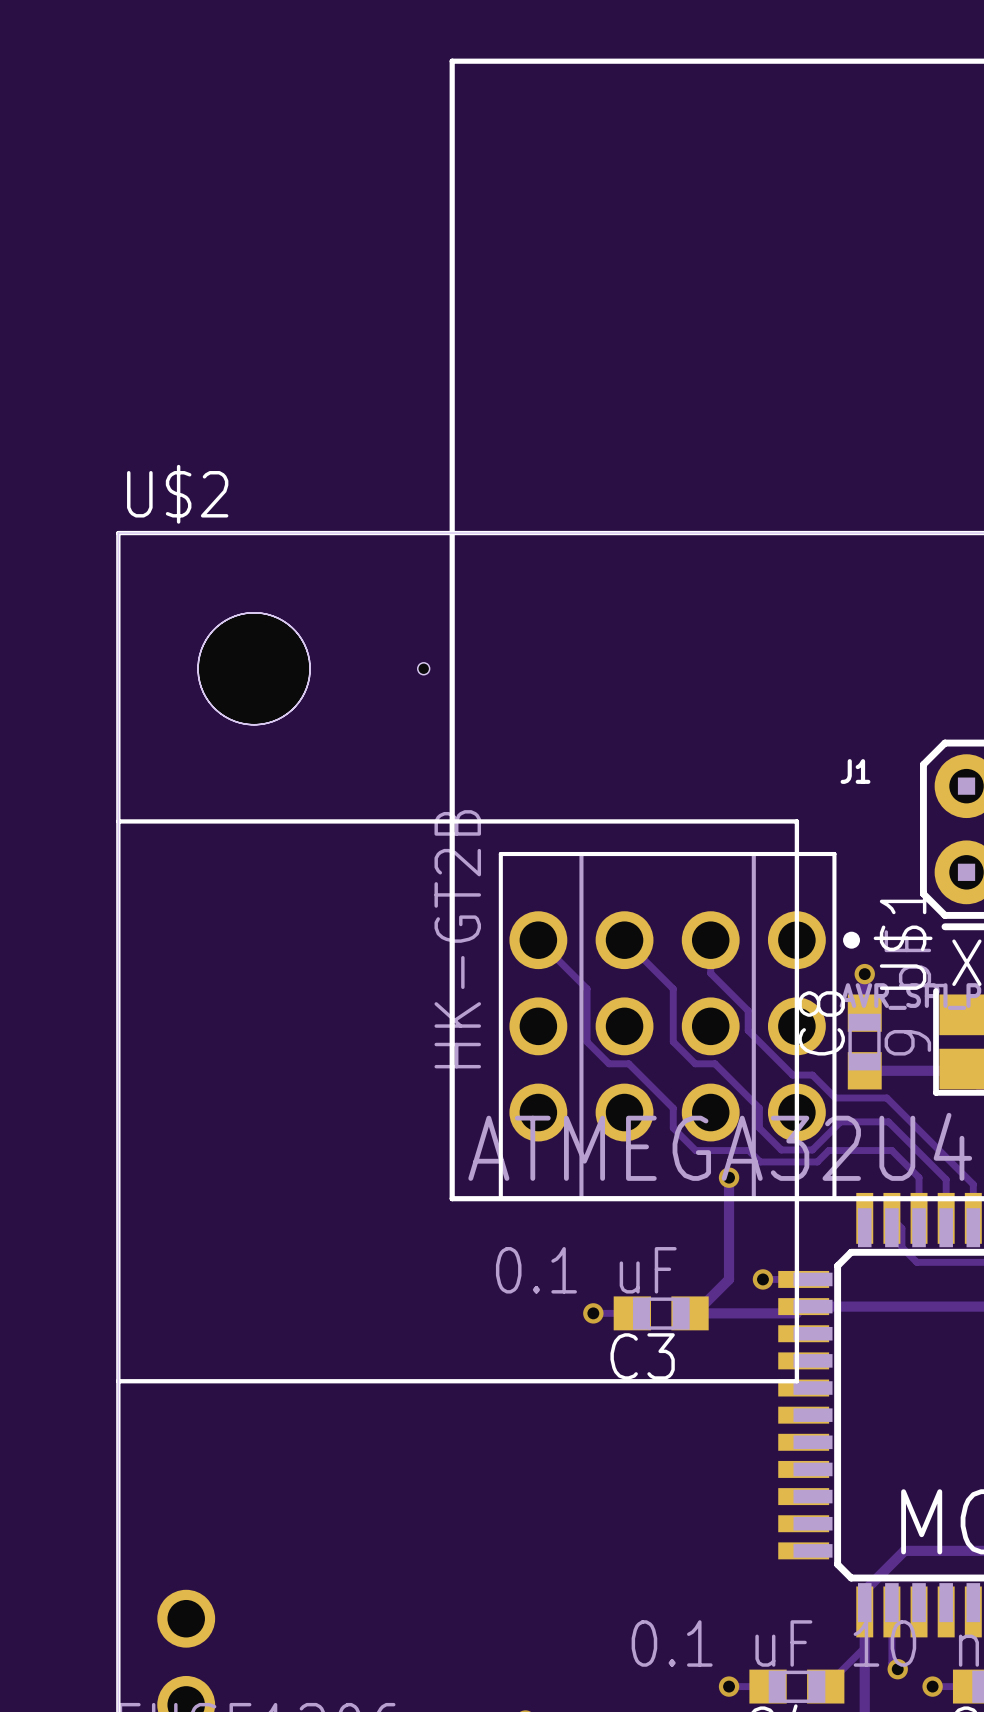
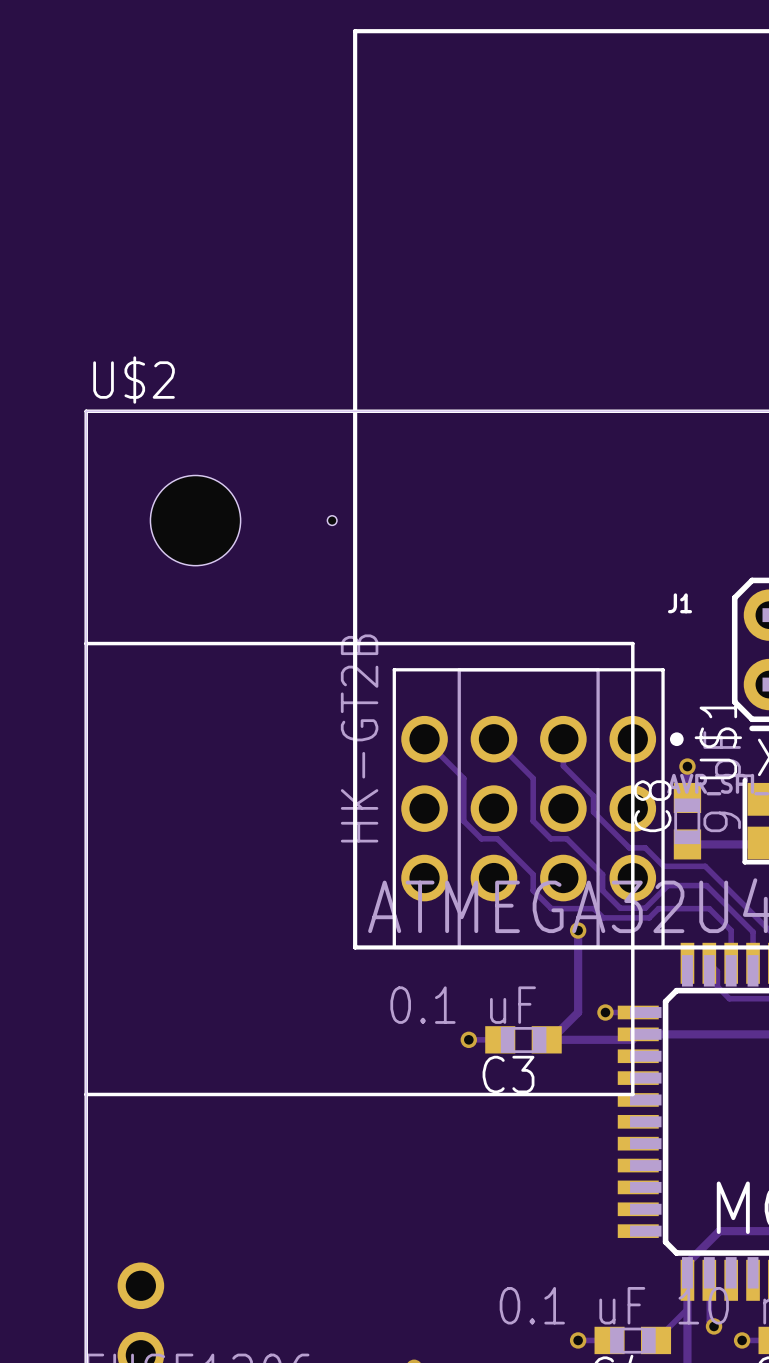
hole: (254, 668) -> none

